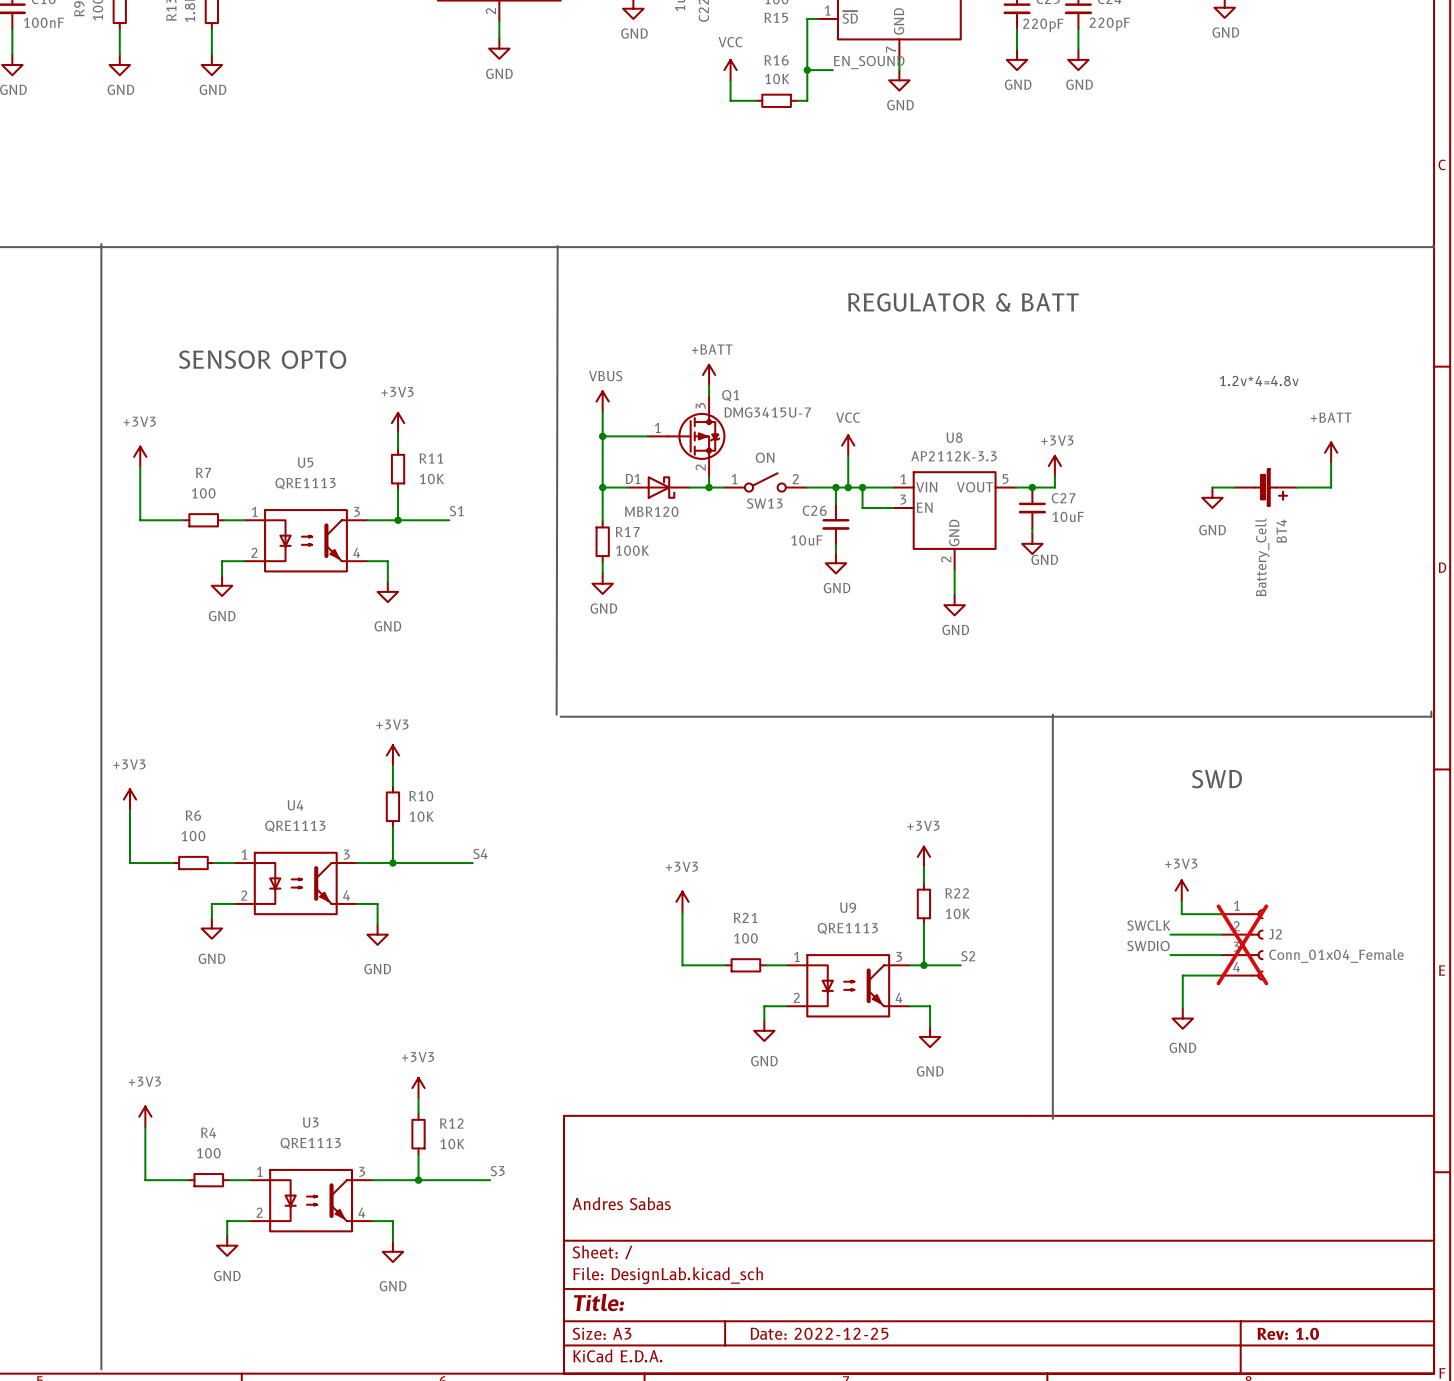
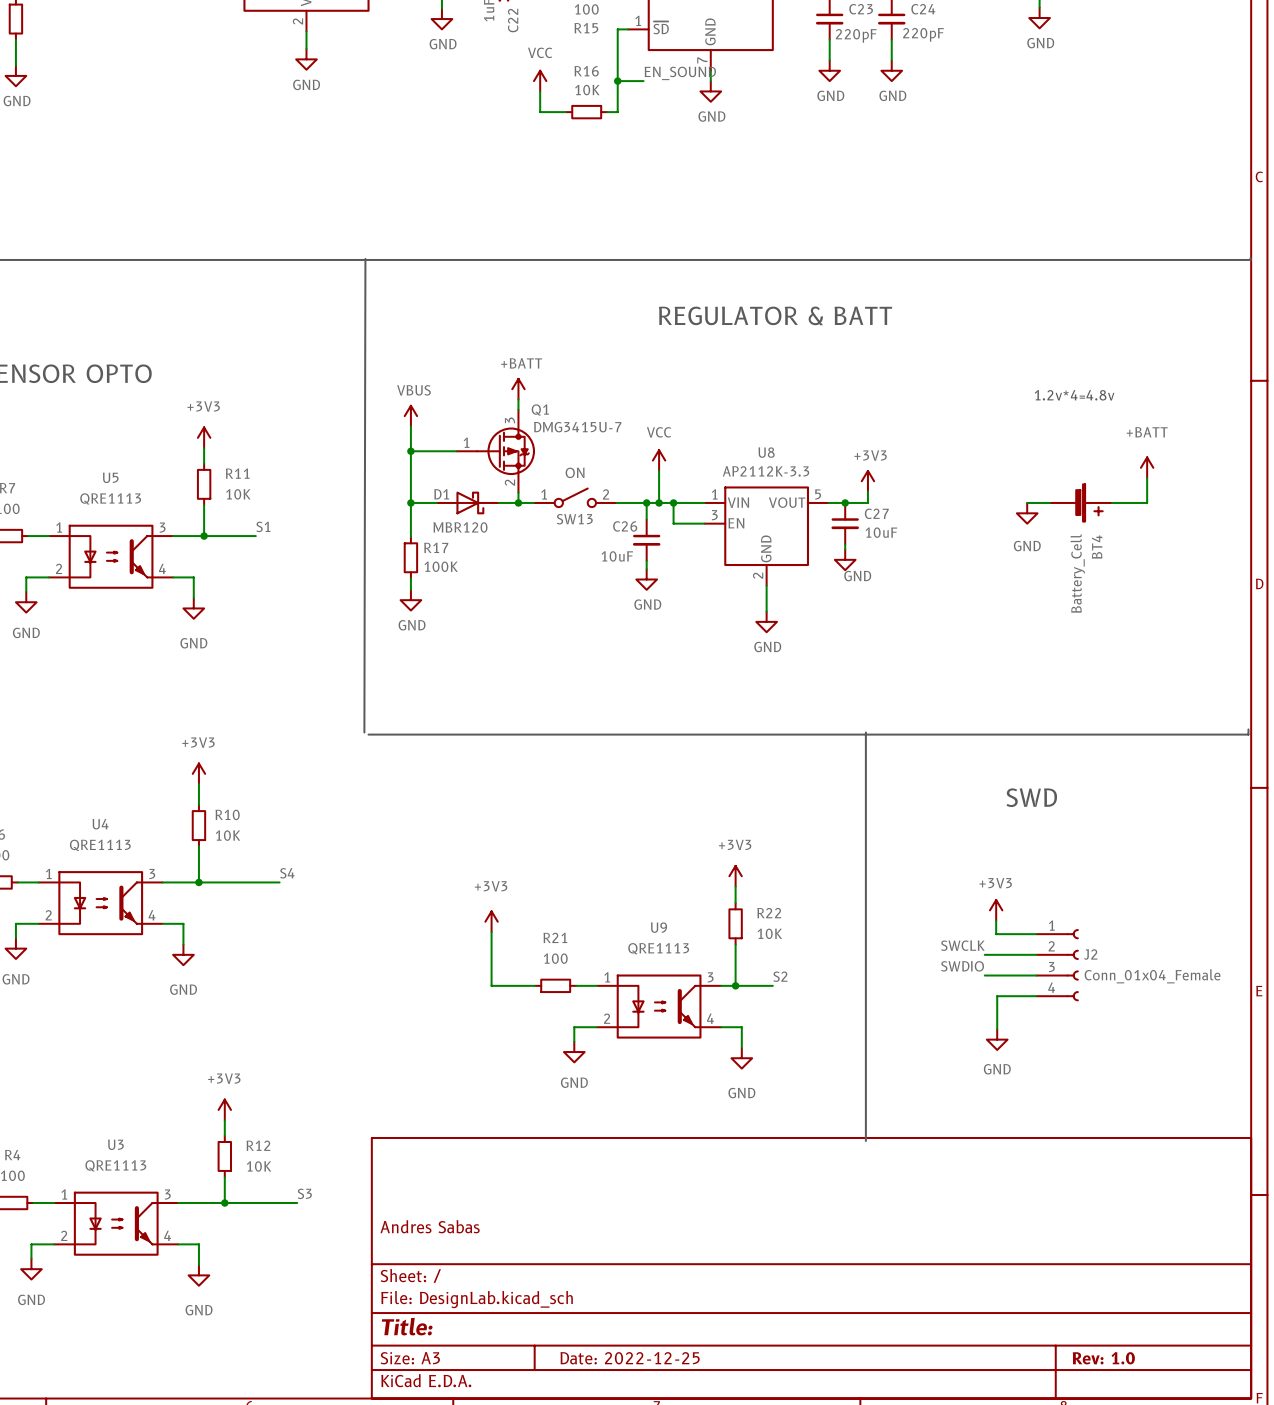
J2 do-not-place cross: (1242, 944) -> none

